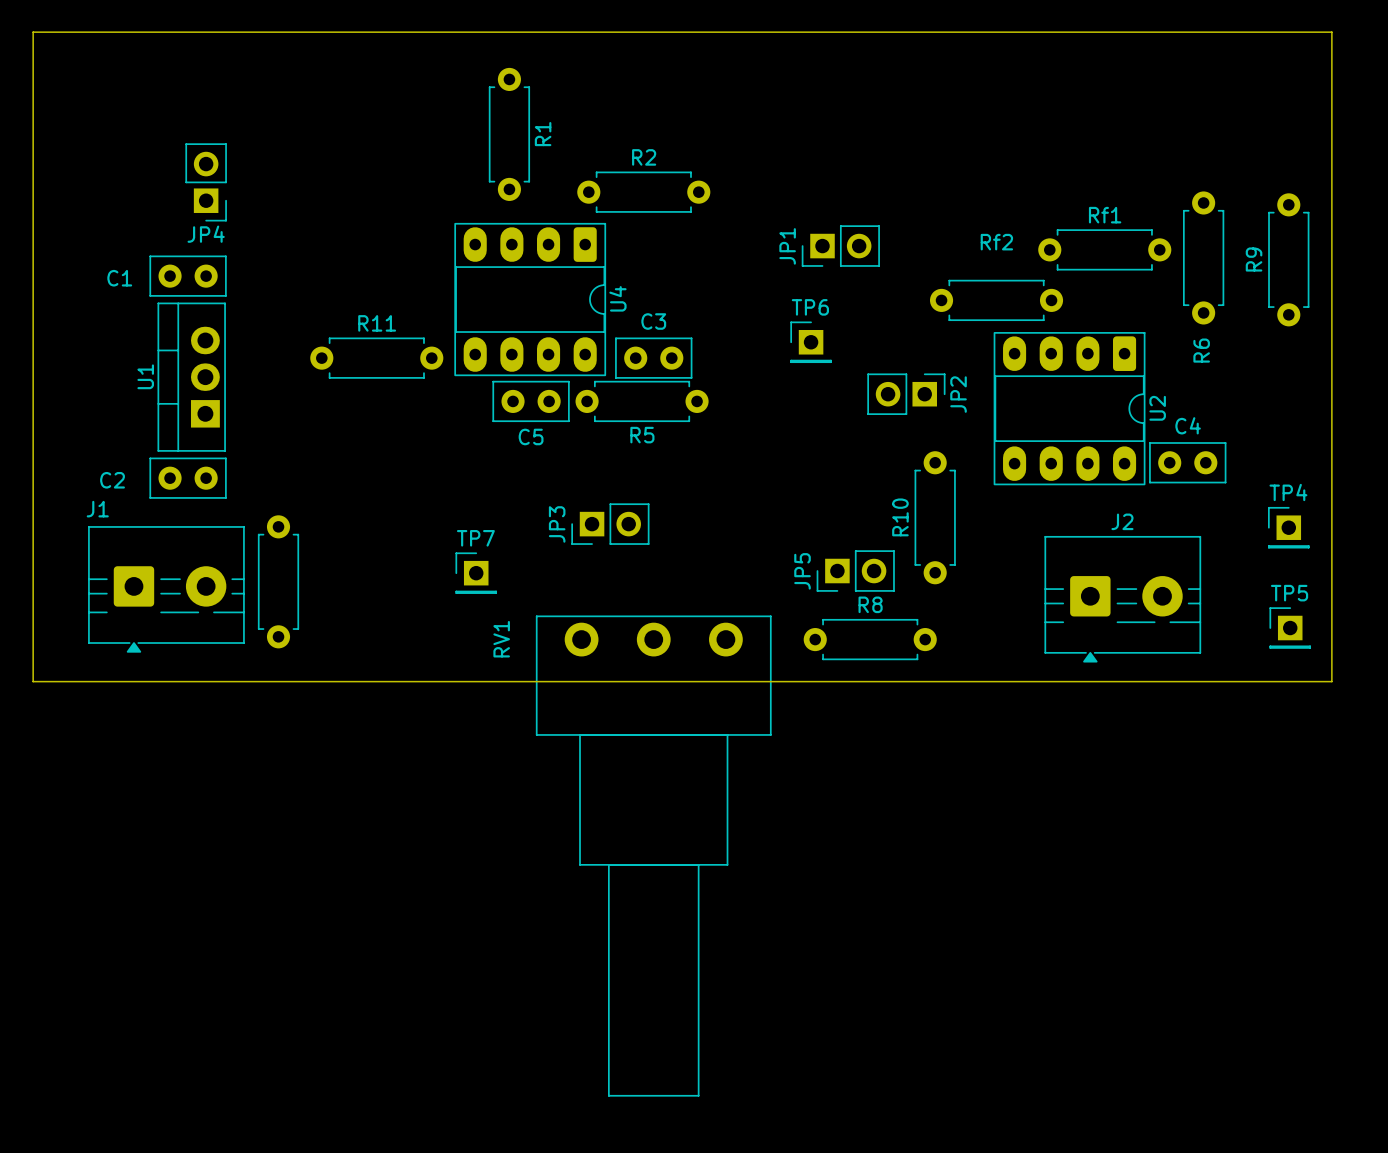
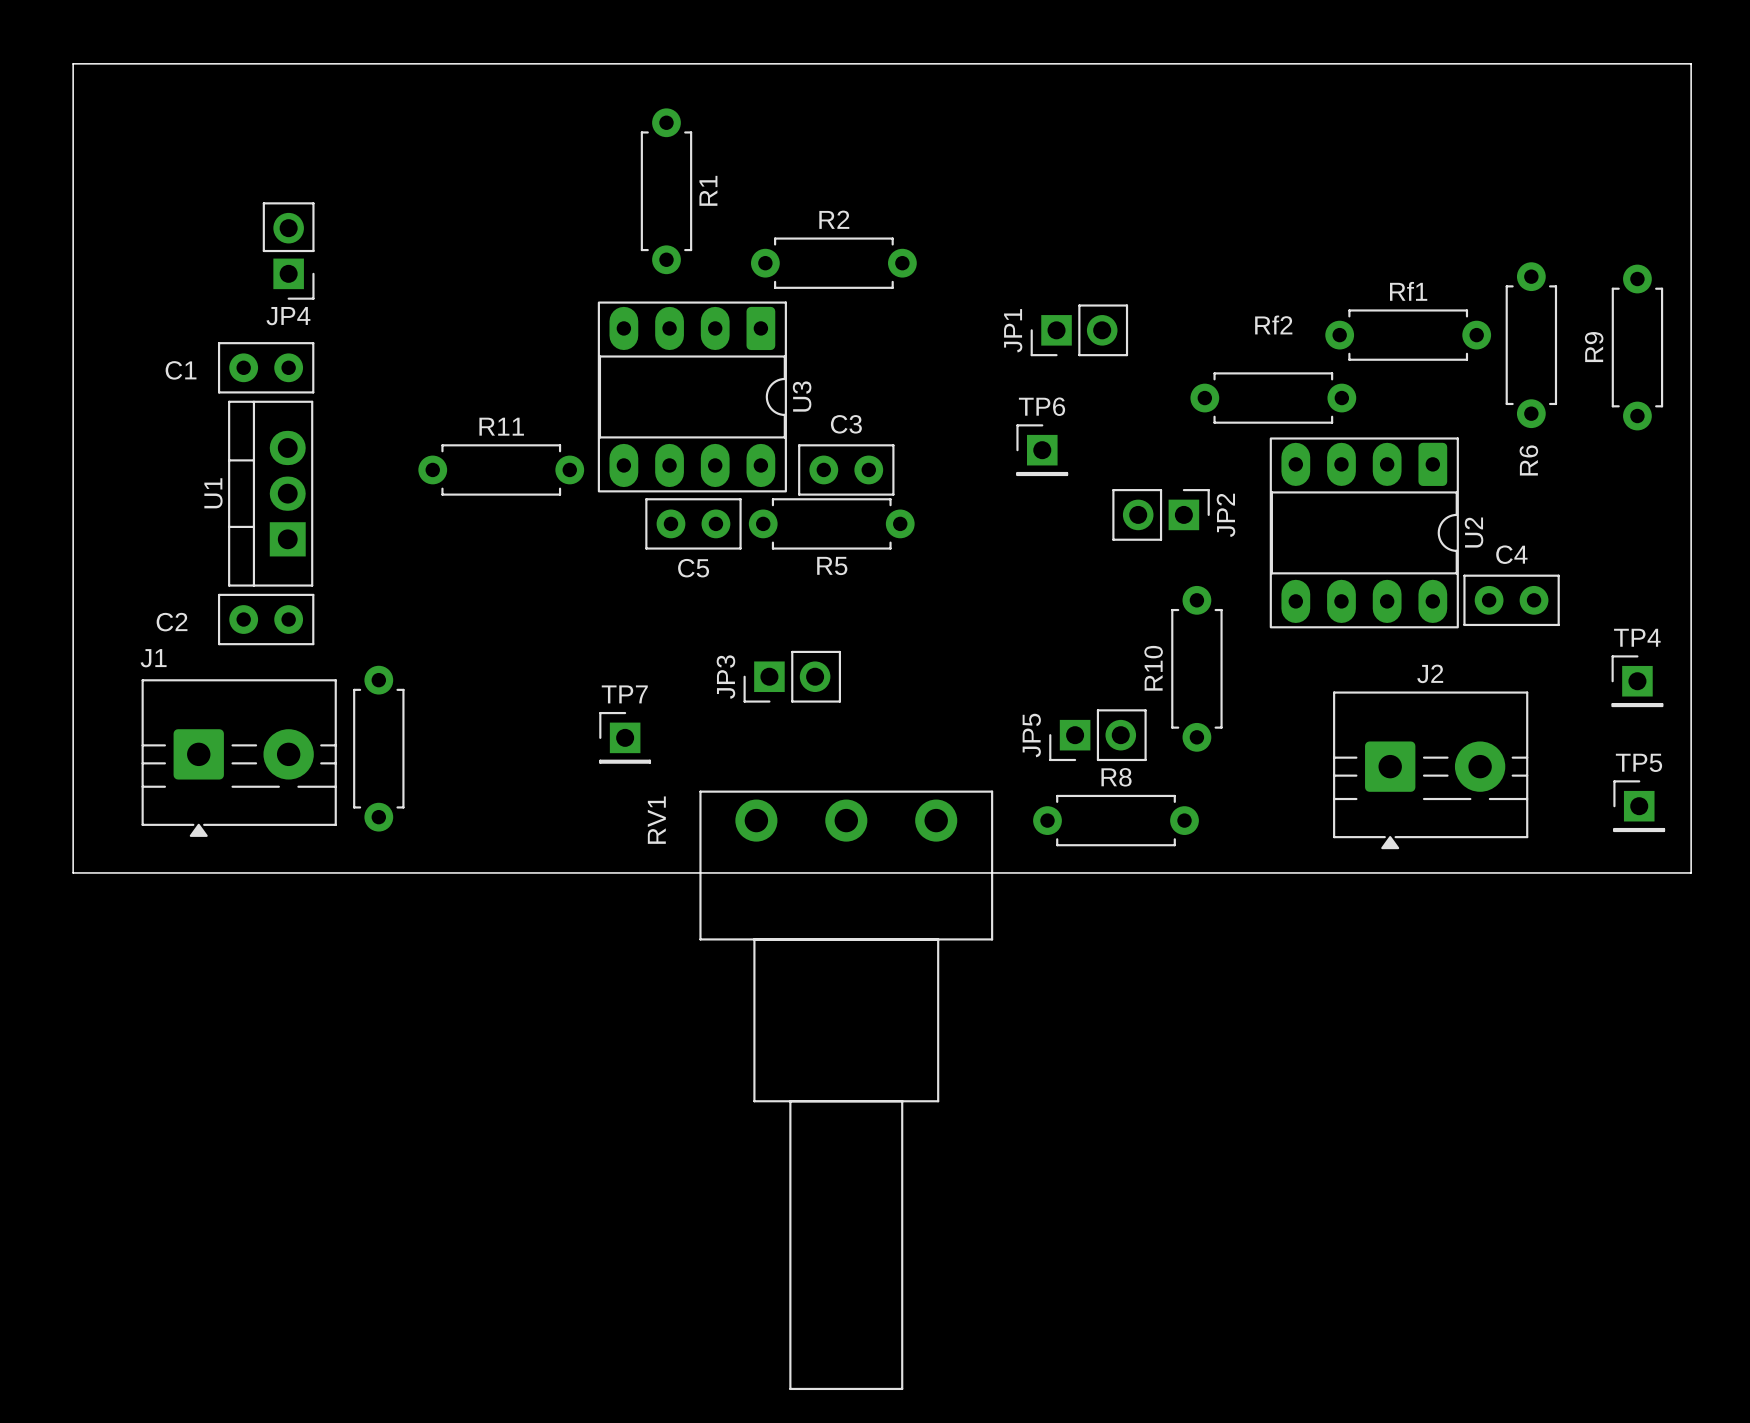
U4 name: U4 (617, 298) -> U3 (802, 396)

